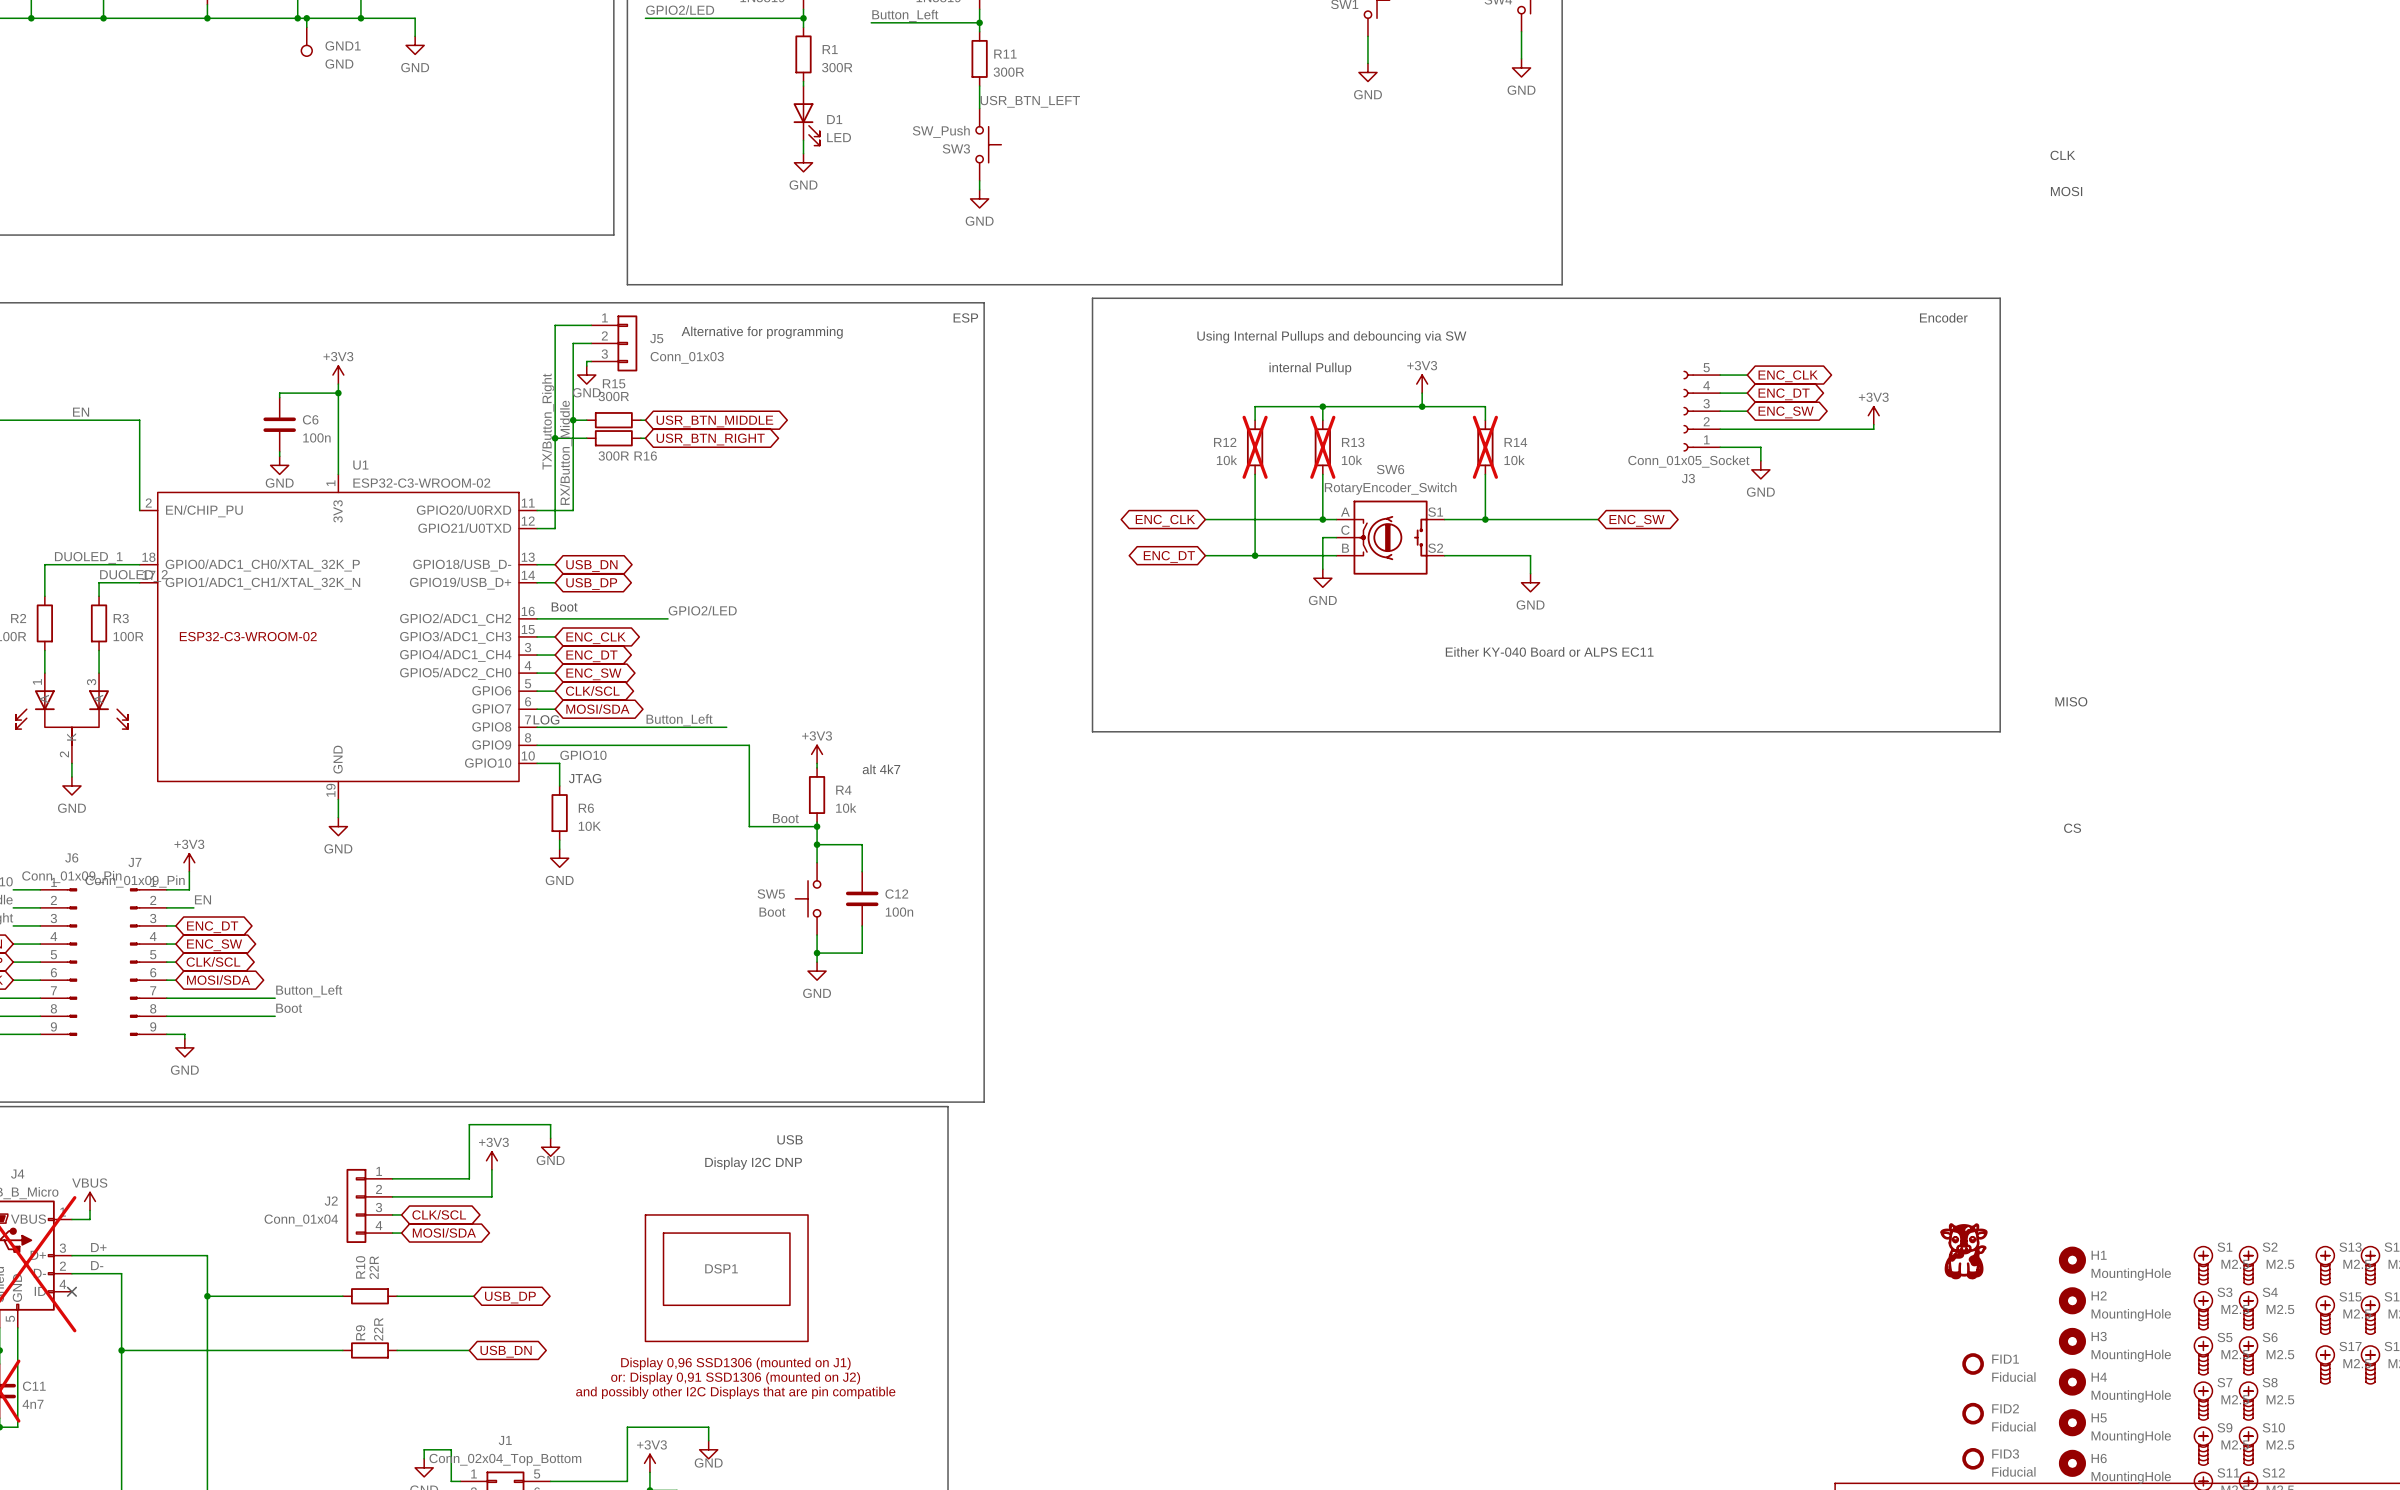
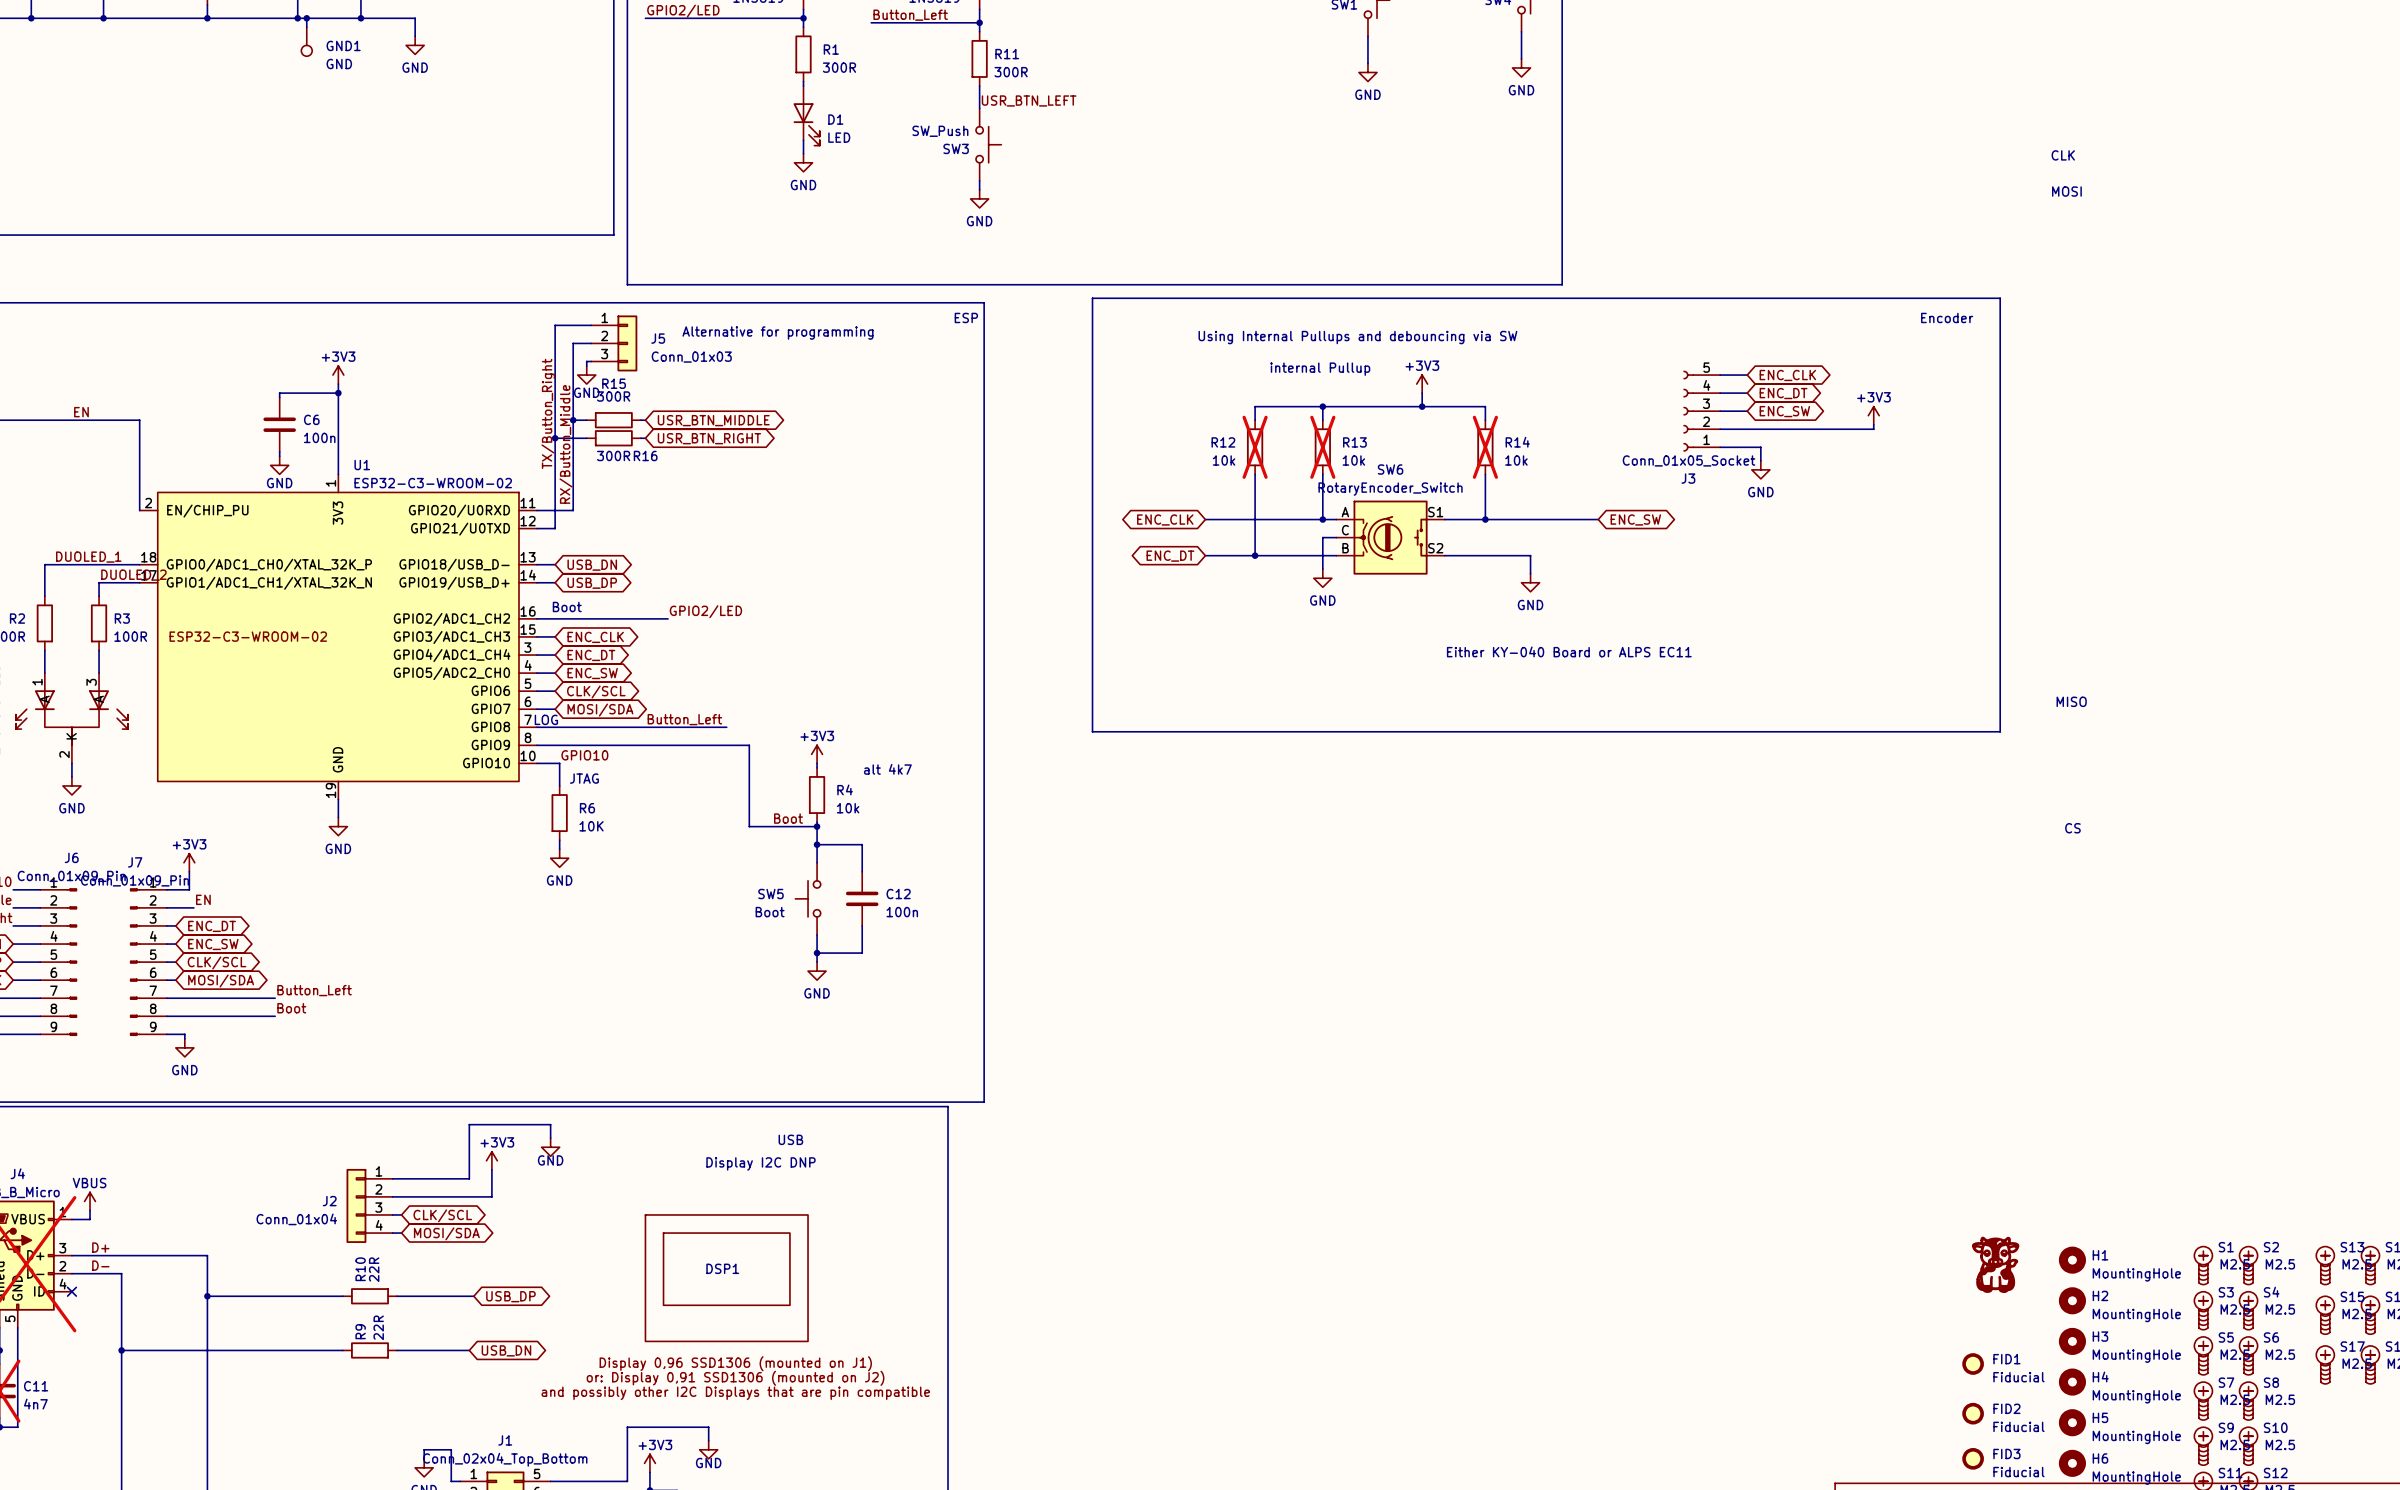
power symbol position: (1964, 1251) -> (1995, 1264)

